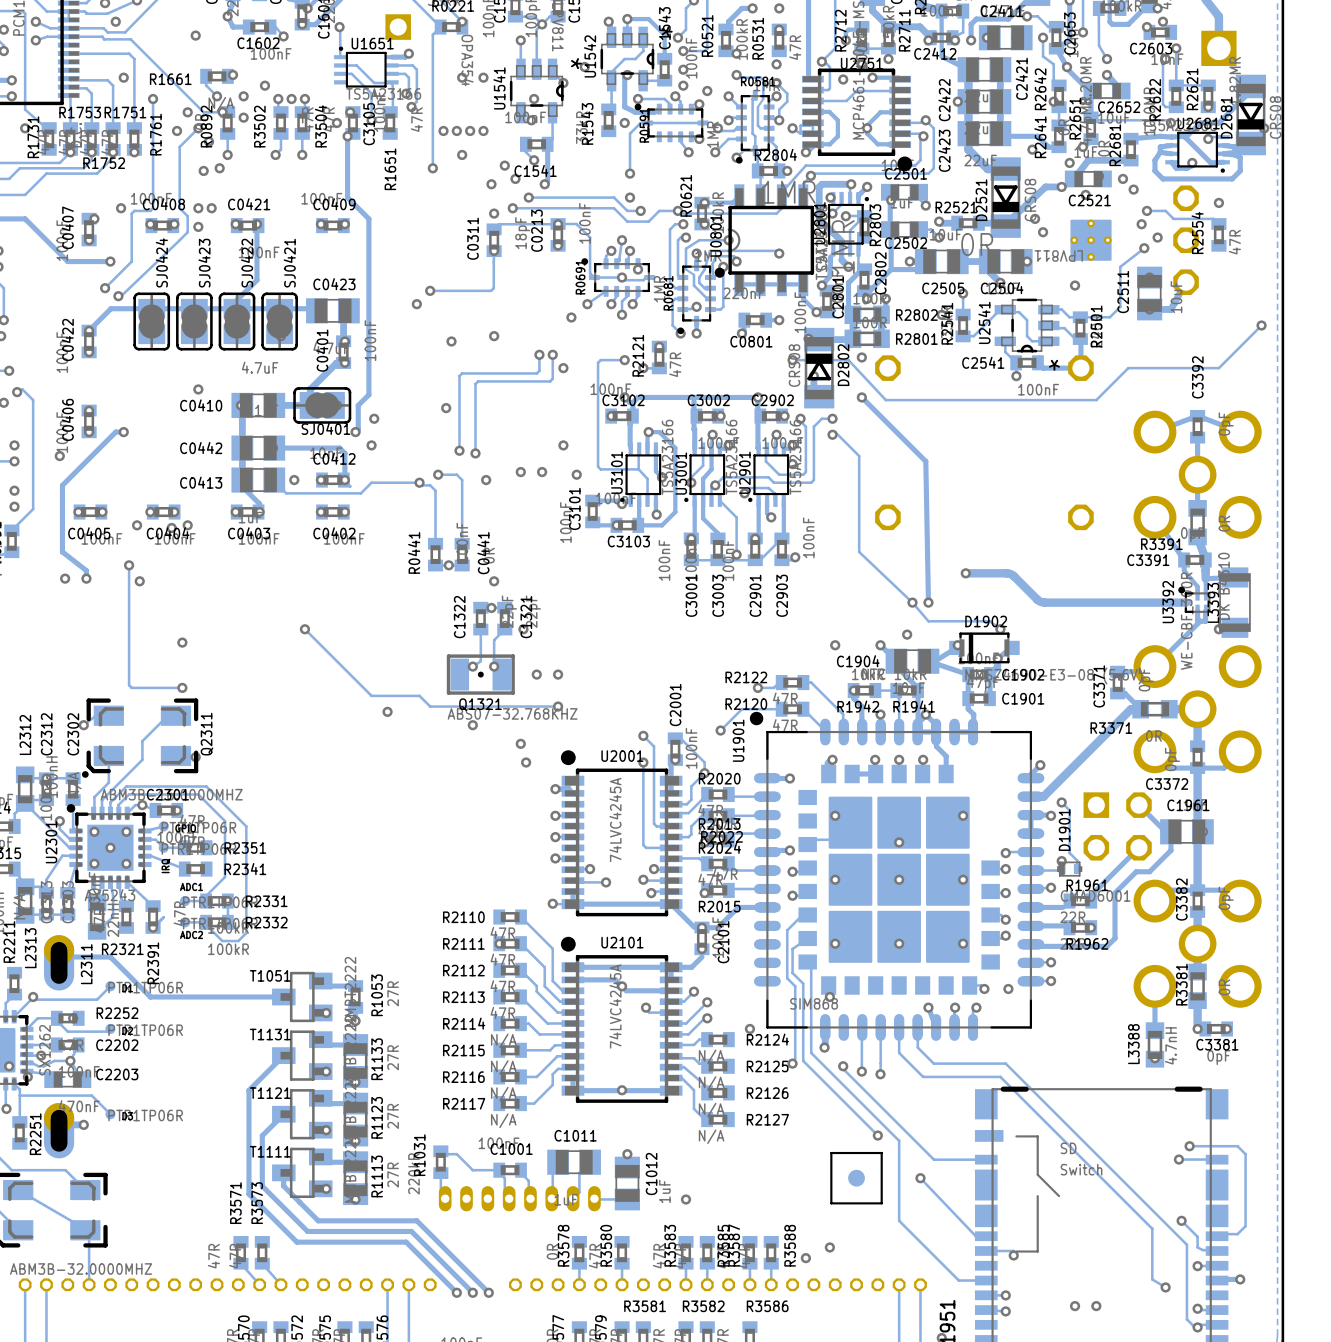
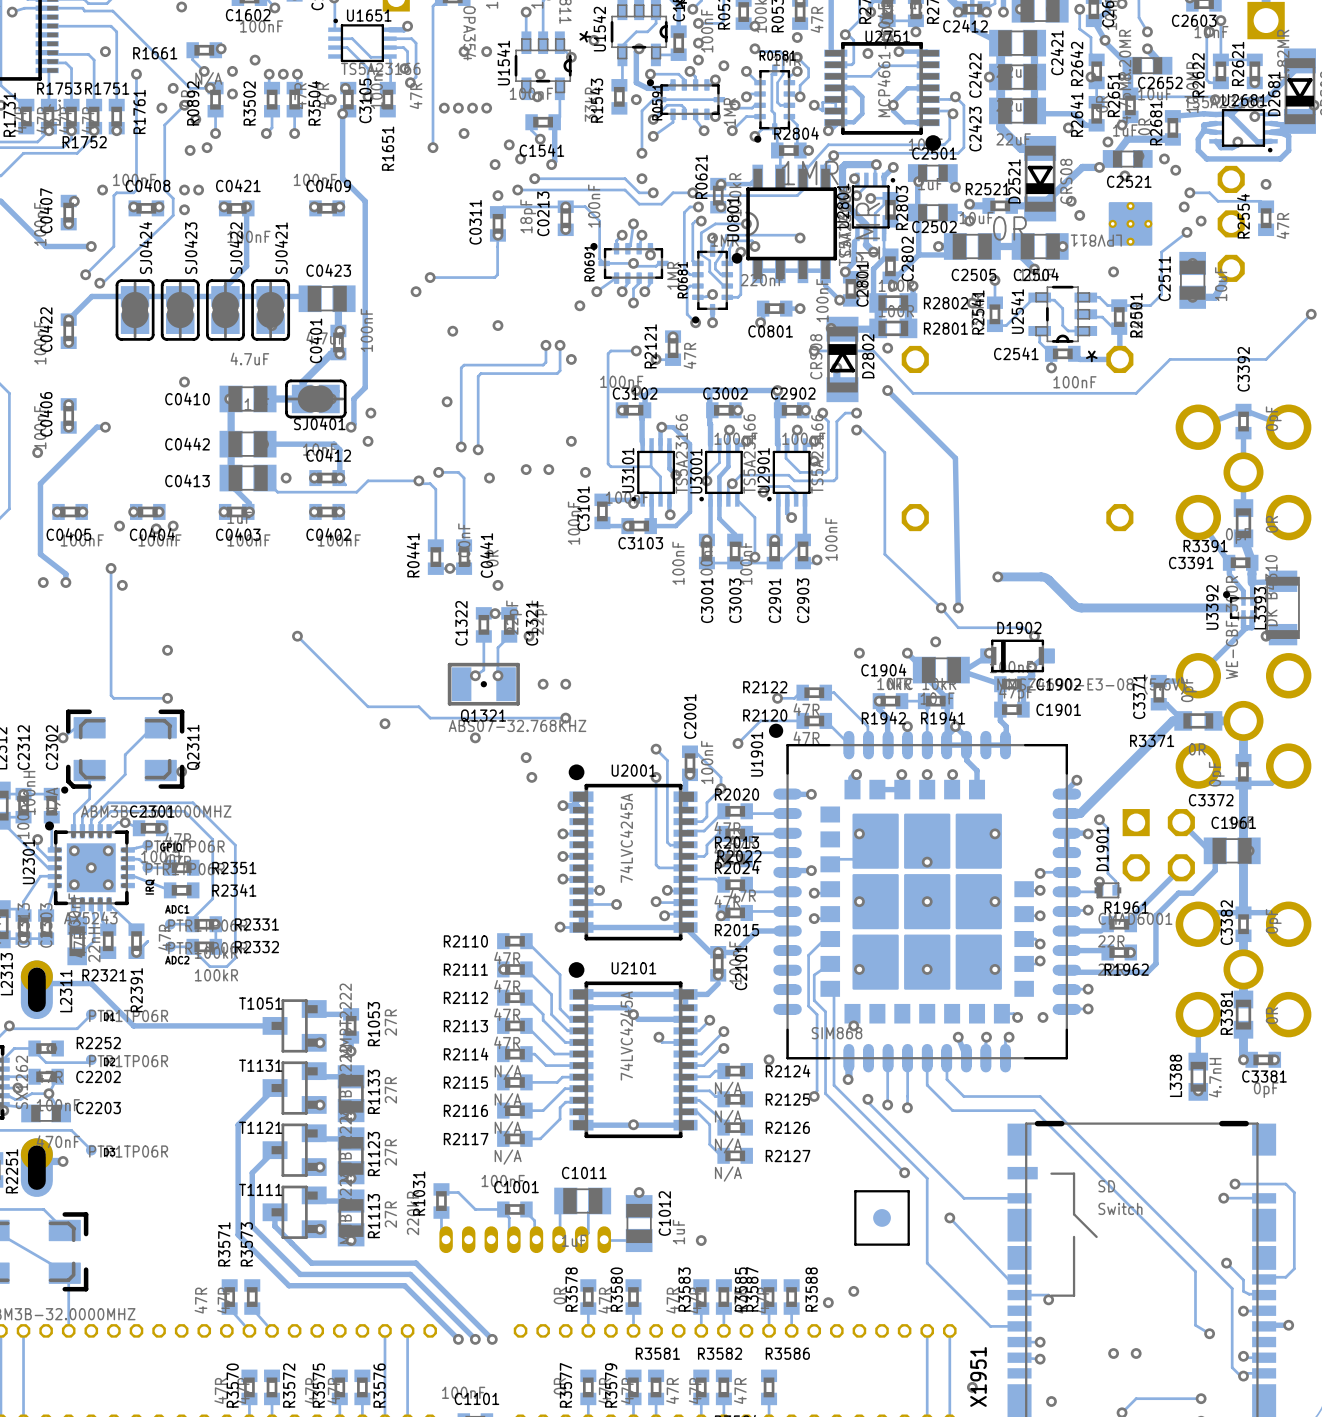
track: none -> (673, 114) (673, 122) (653, 136)
track: none -> (684, 114) (684, 108) (681, 105) (667, 105) (653, 119)
via: none -> (653, 119)
via: none -> (653, 136)

